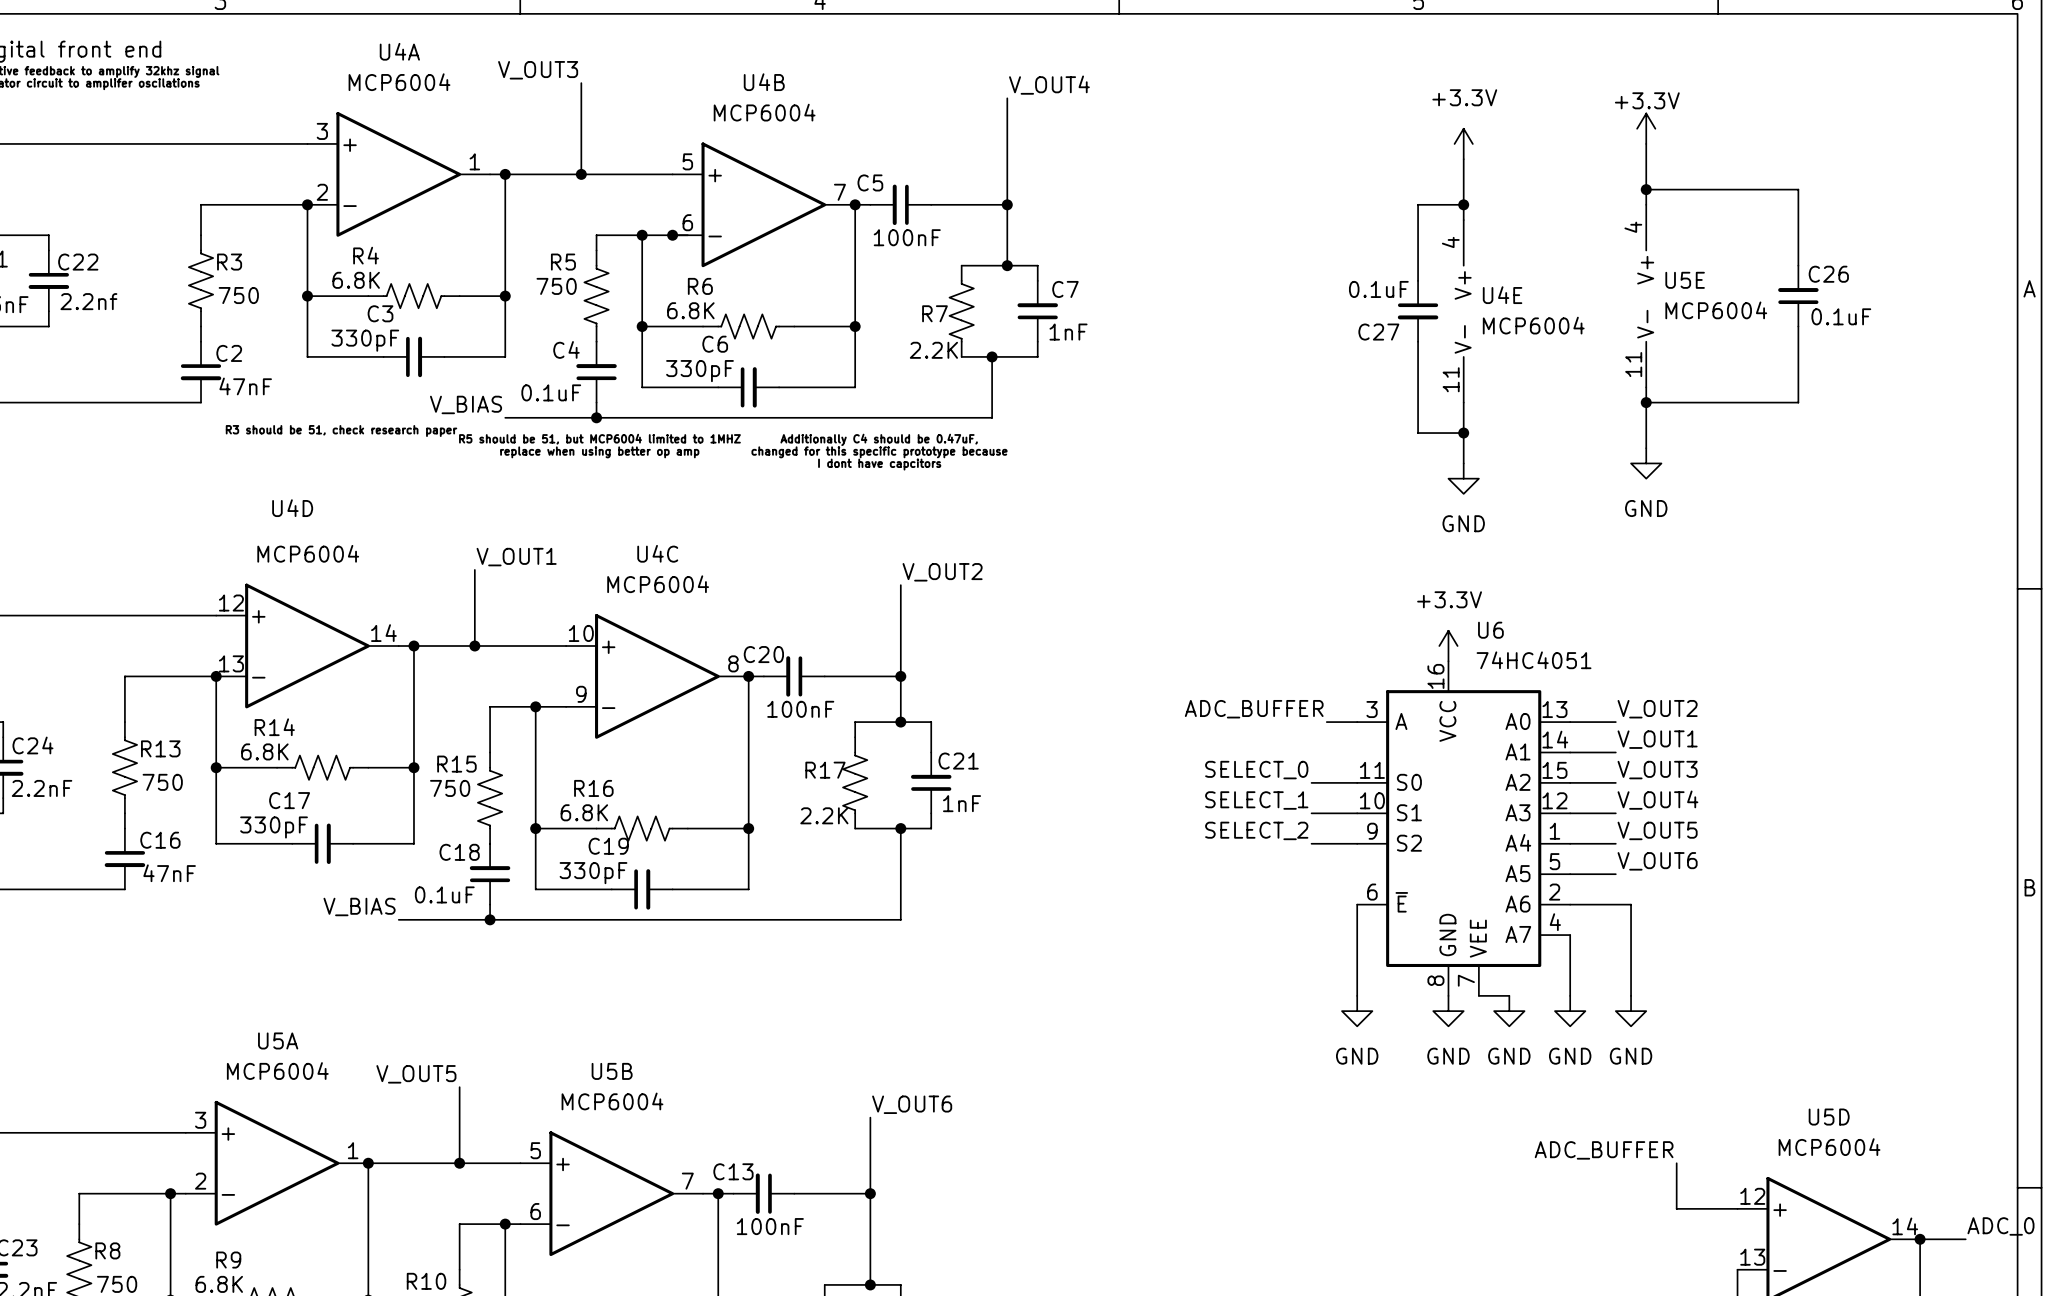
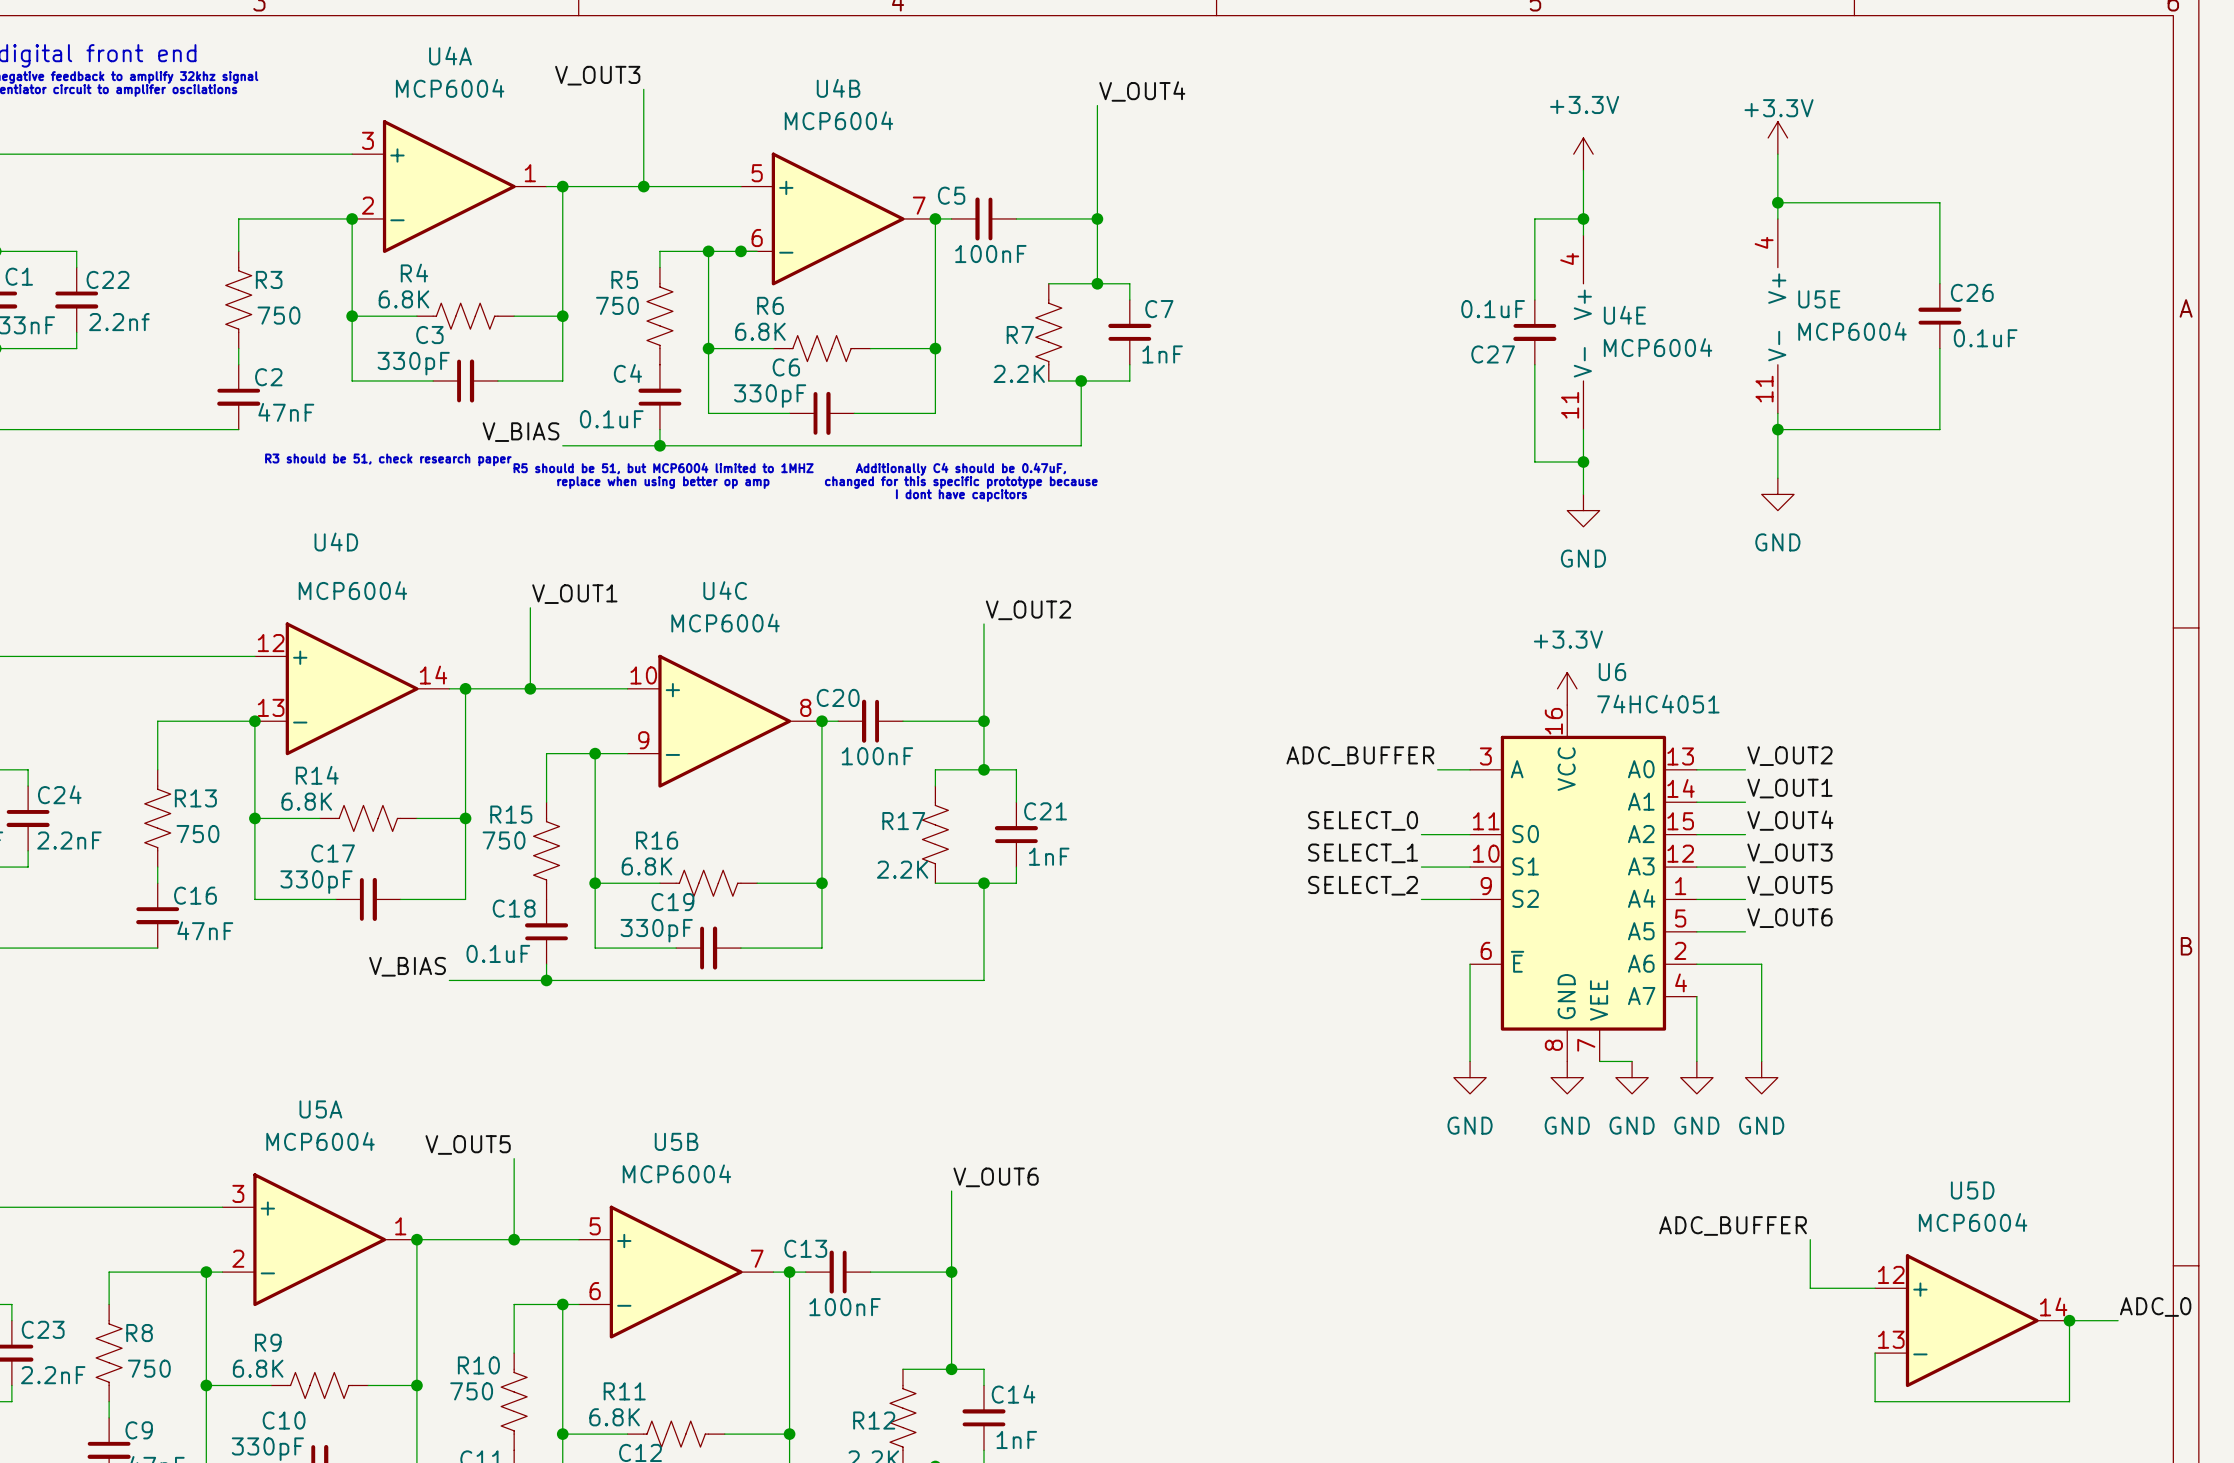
label: V_OUT3 (1657, 770) -> V_OUT4 (1790, 820)
label: V_OUT4 (1657, 800) -> V_OUT3 (1789, 853)

